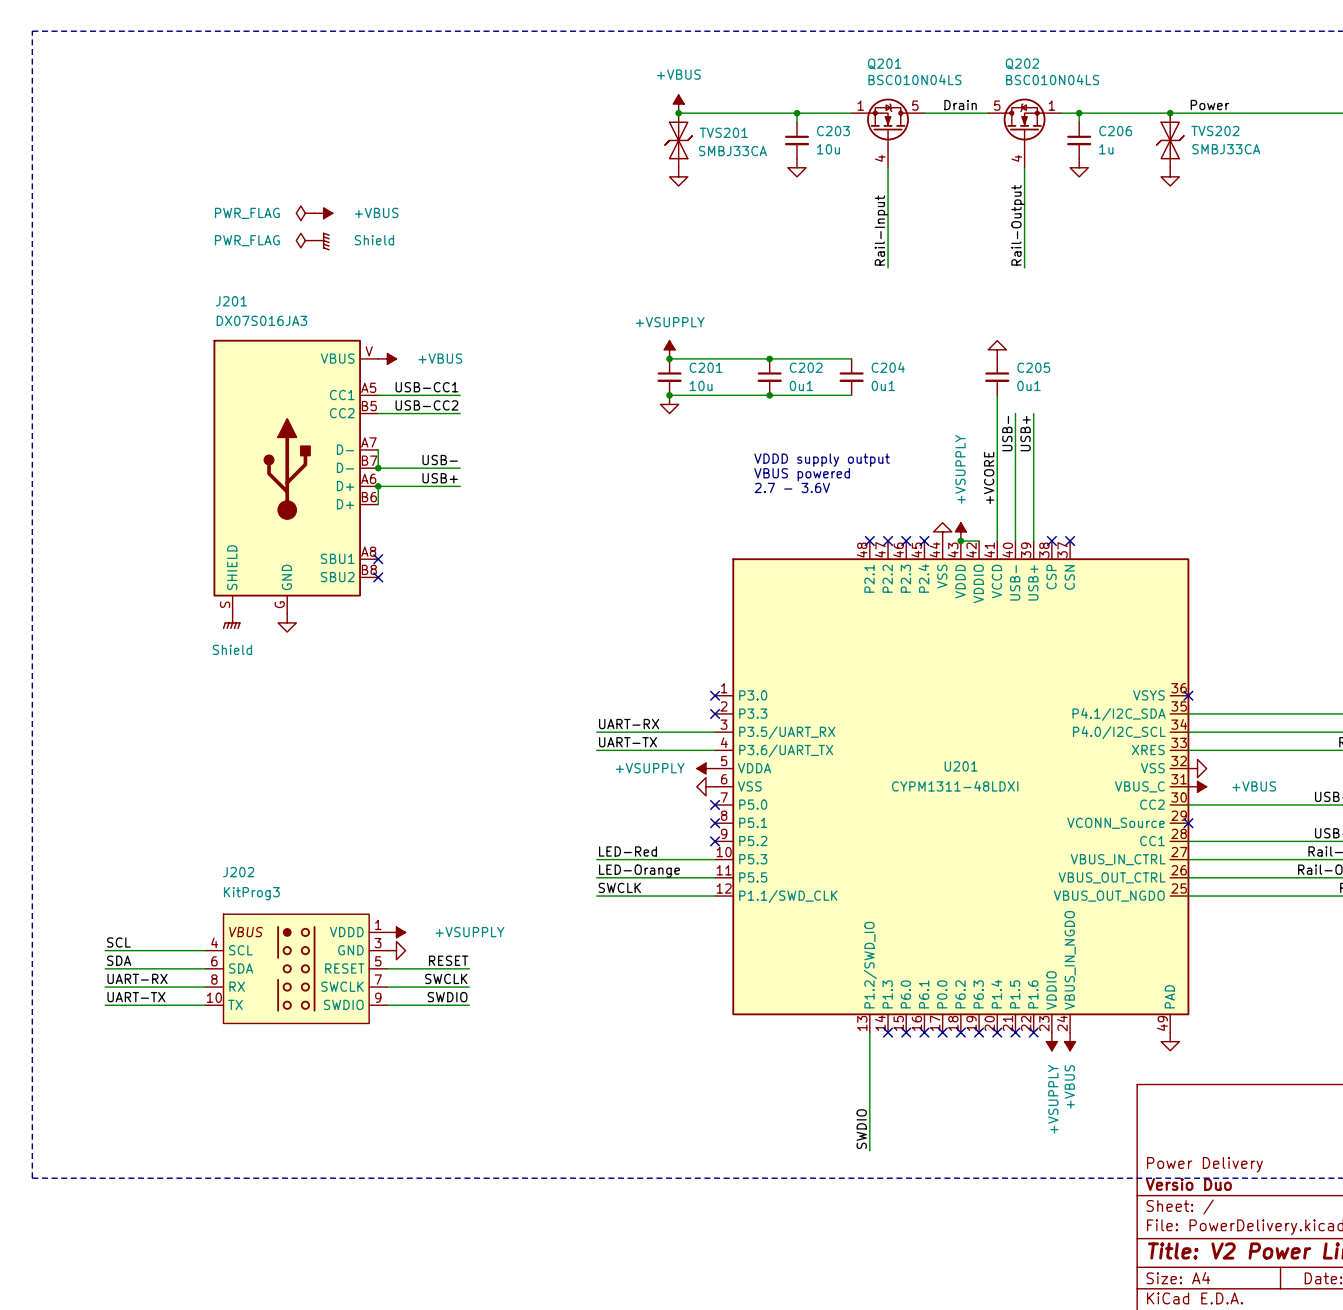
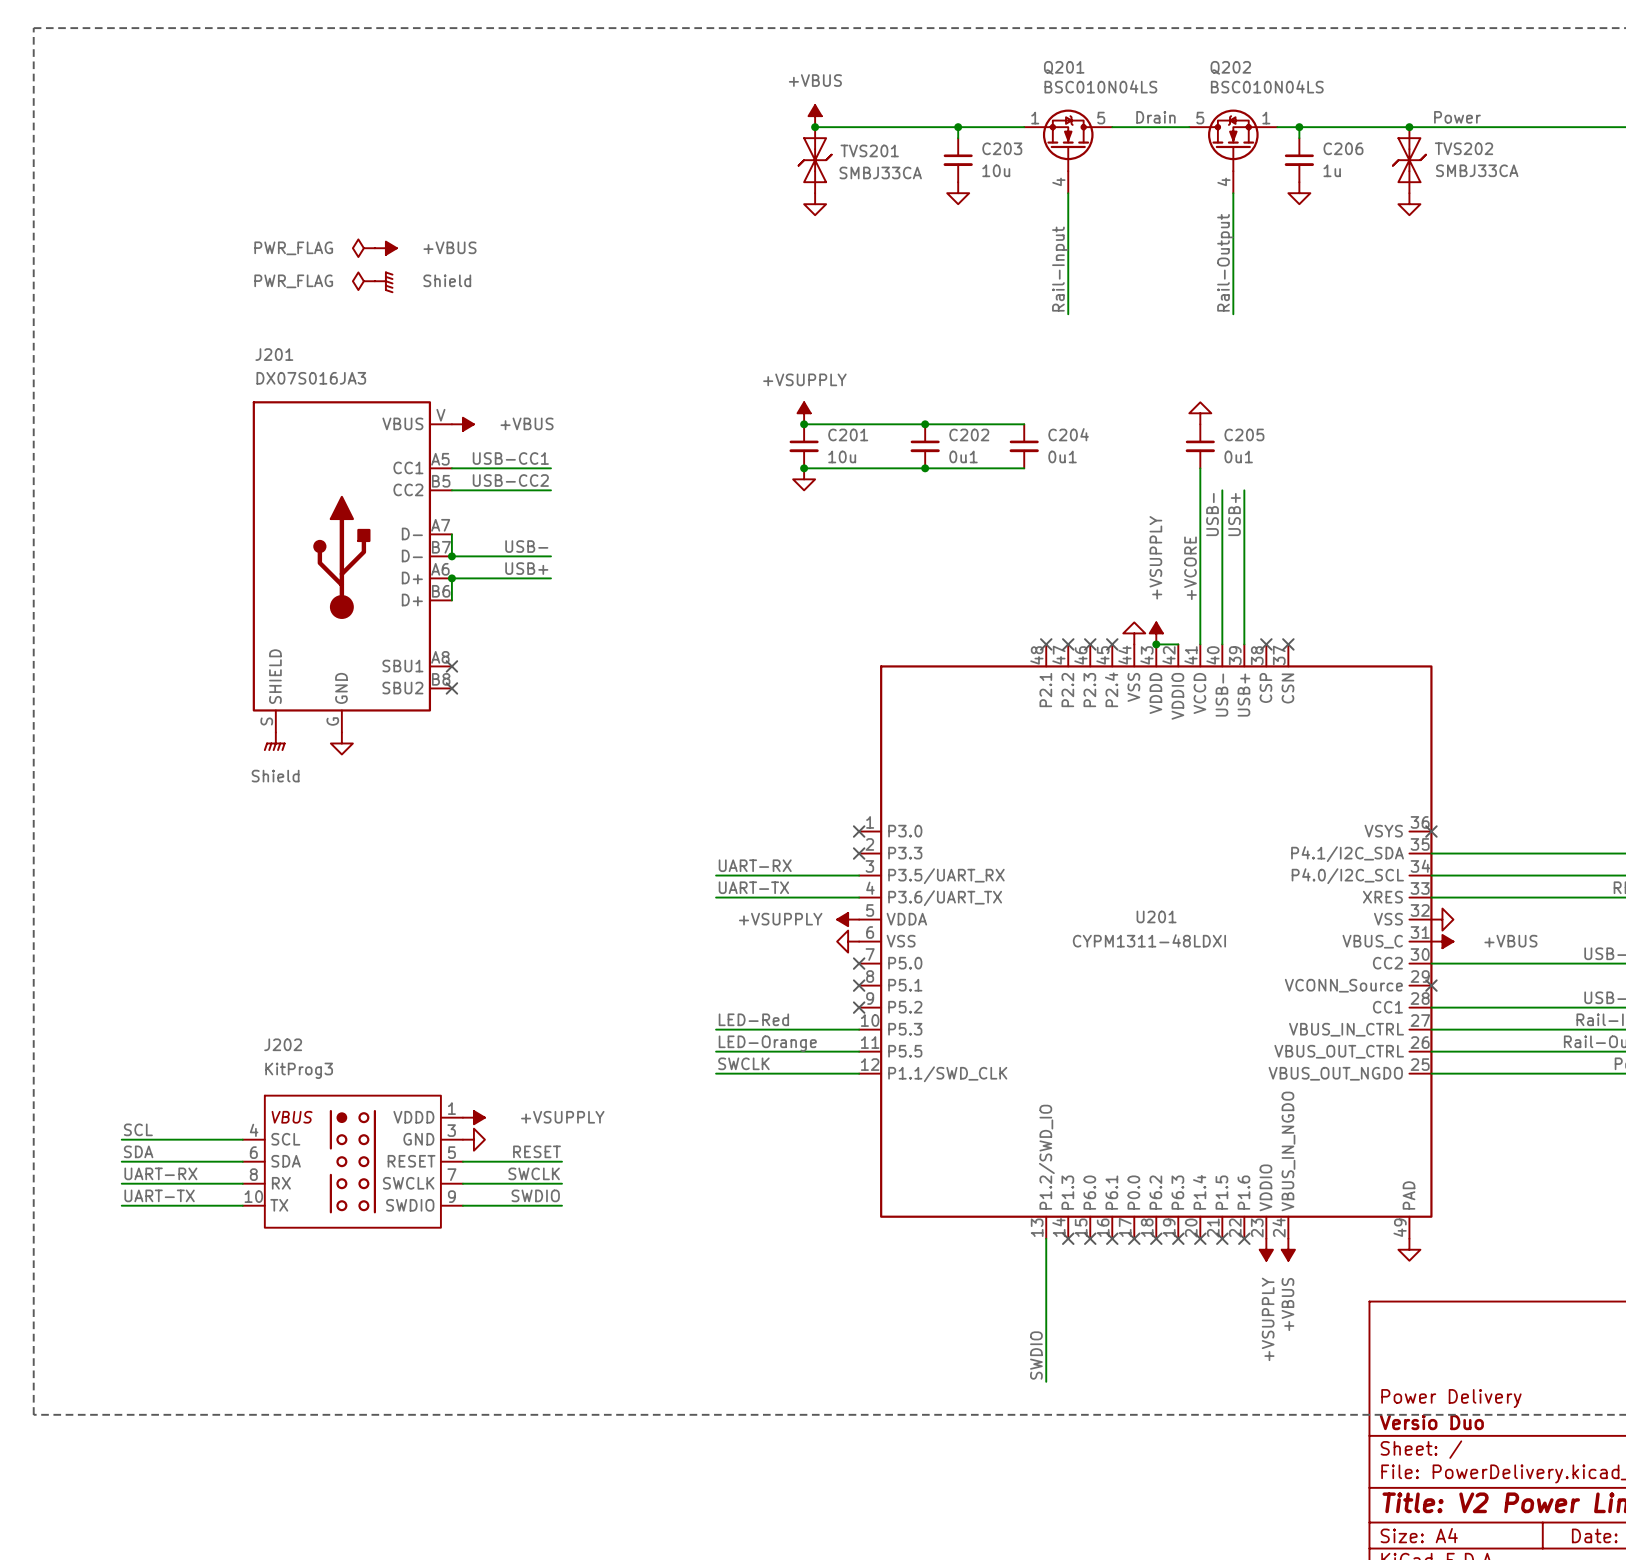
text: VDDD supply output (822, 460) -> none
text: VBUS powered (802, 474) -> none
text: 2.7 - 3.6V (792, 487) -> none

